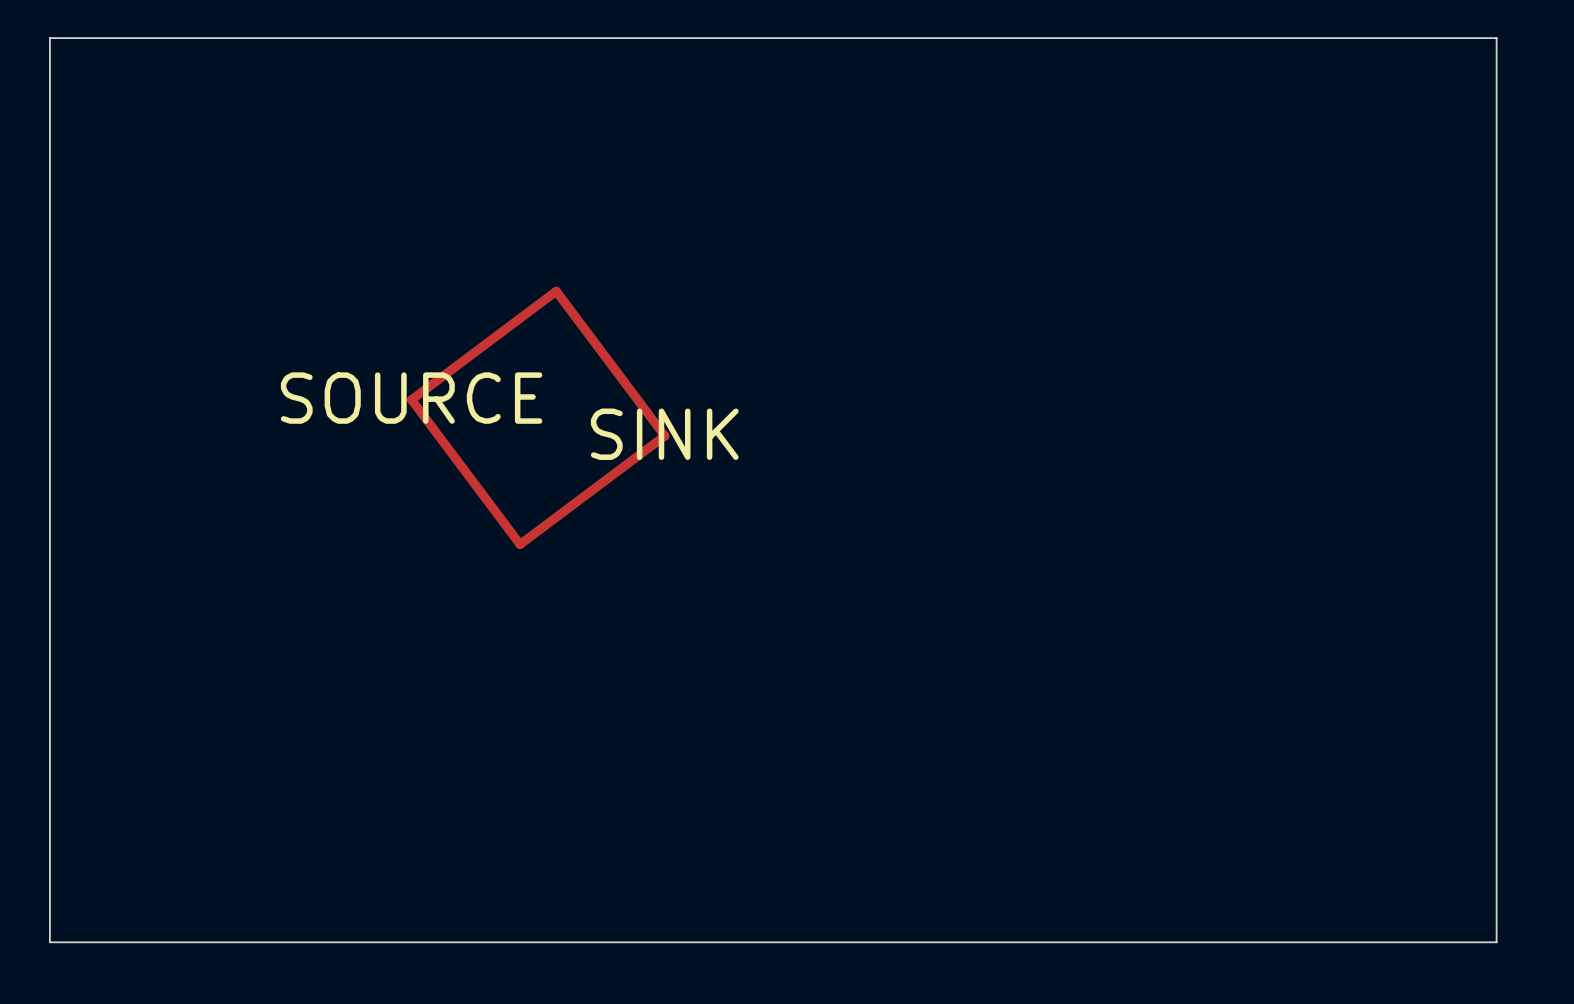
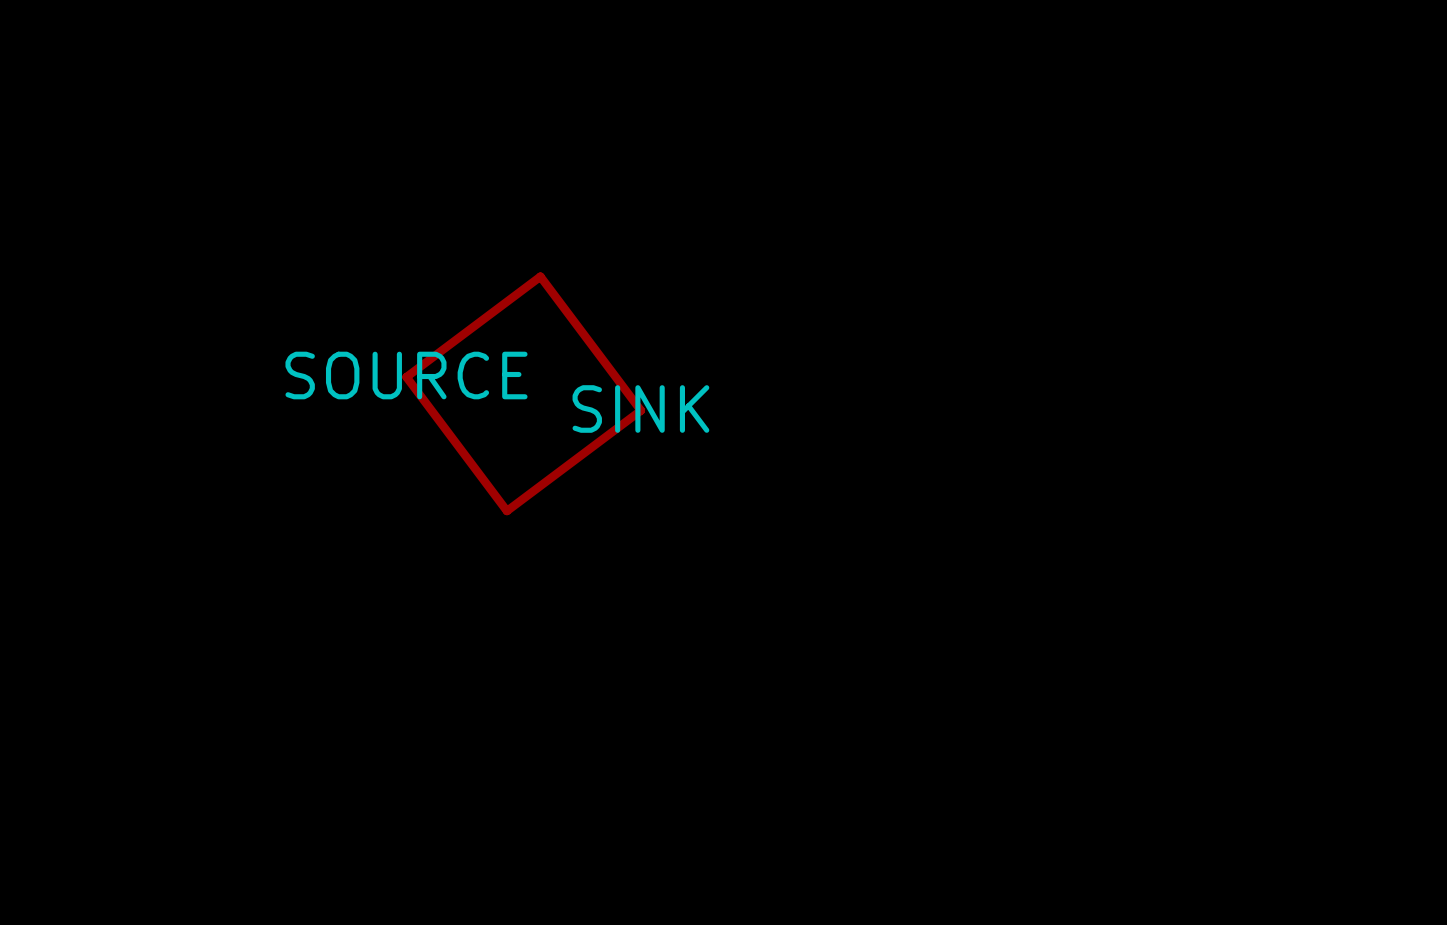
board edge: (49, 38) (1496, 38) (1496, 942) (49, 942) (49, 38) -> none

